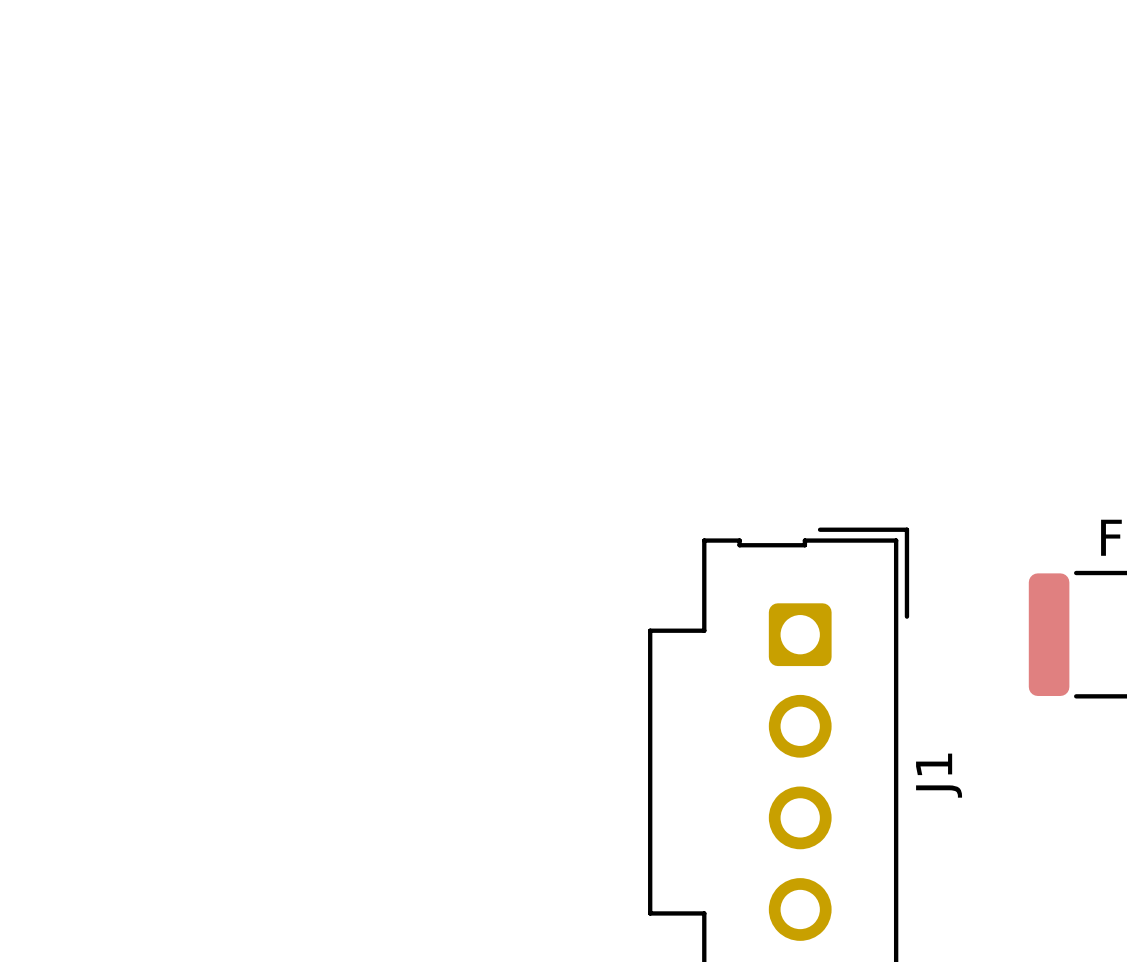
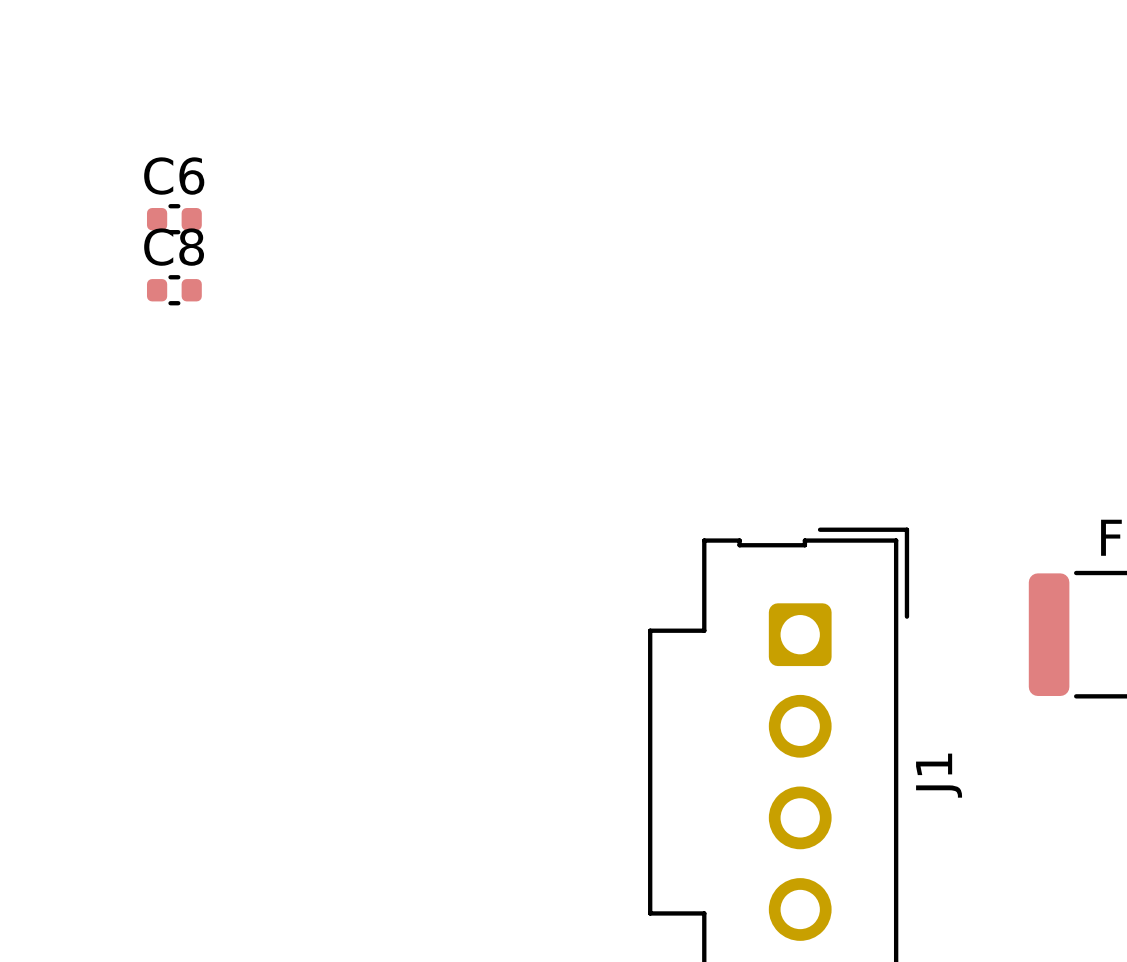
C6: none -> (174, 219)
C8: none -> (174, 290)

